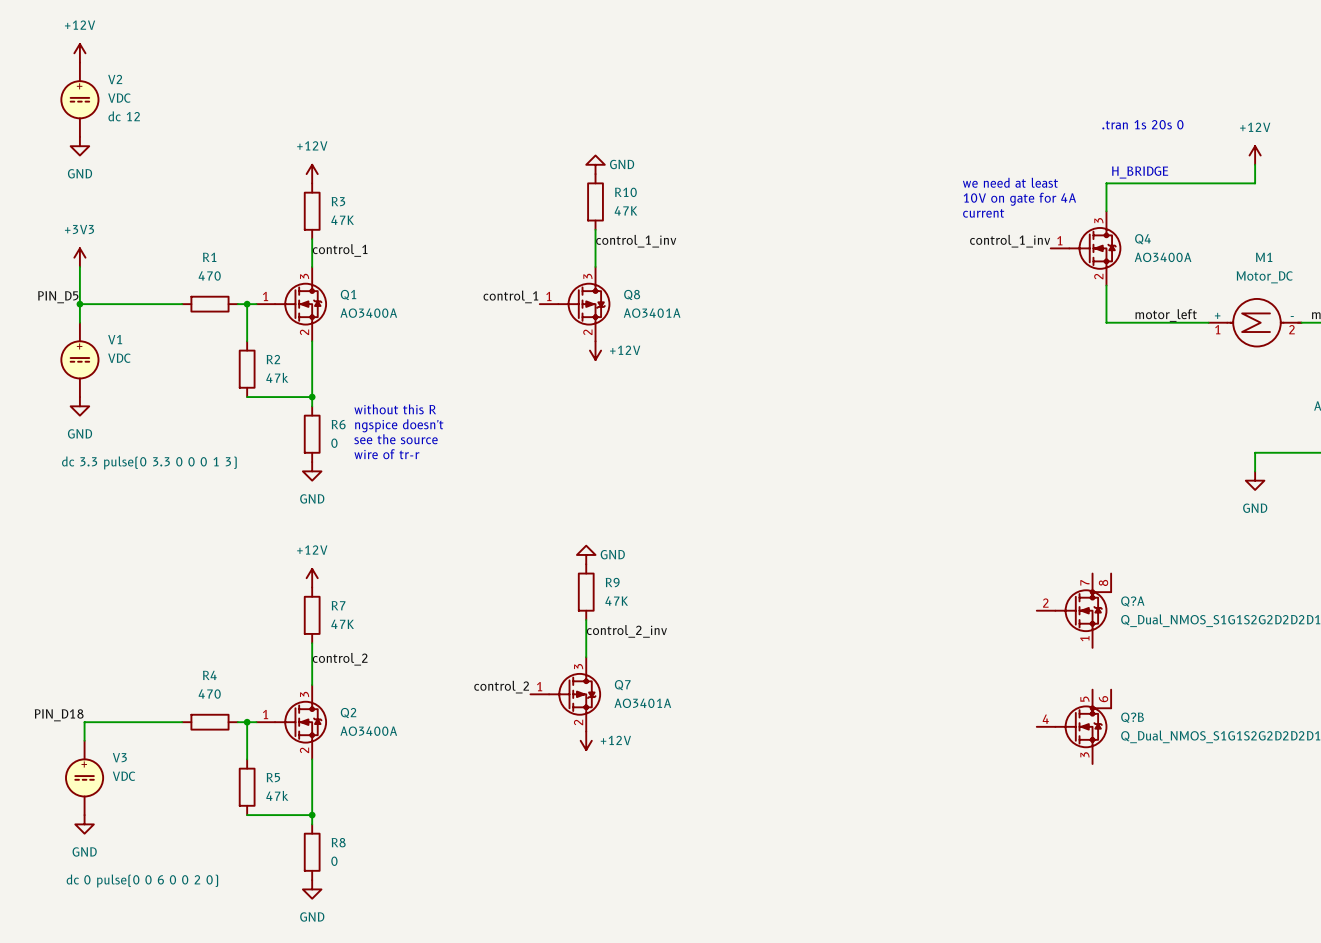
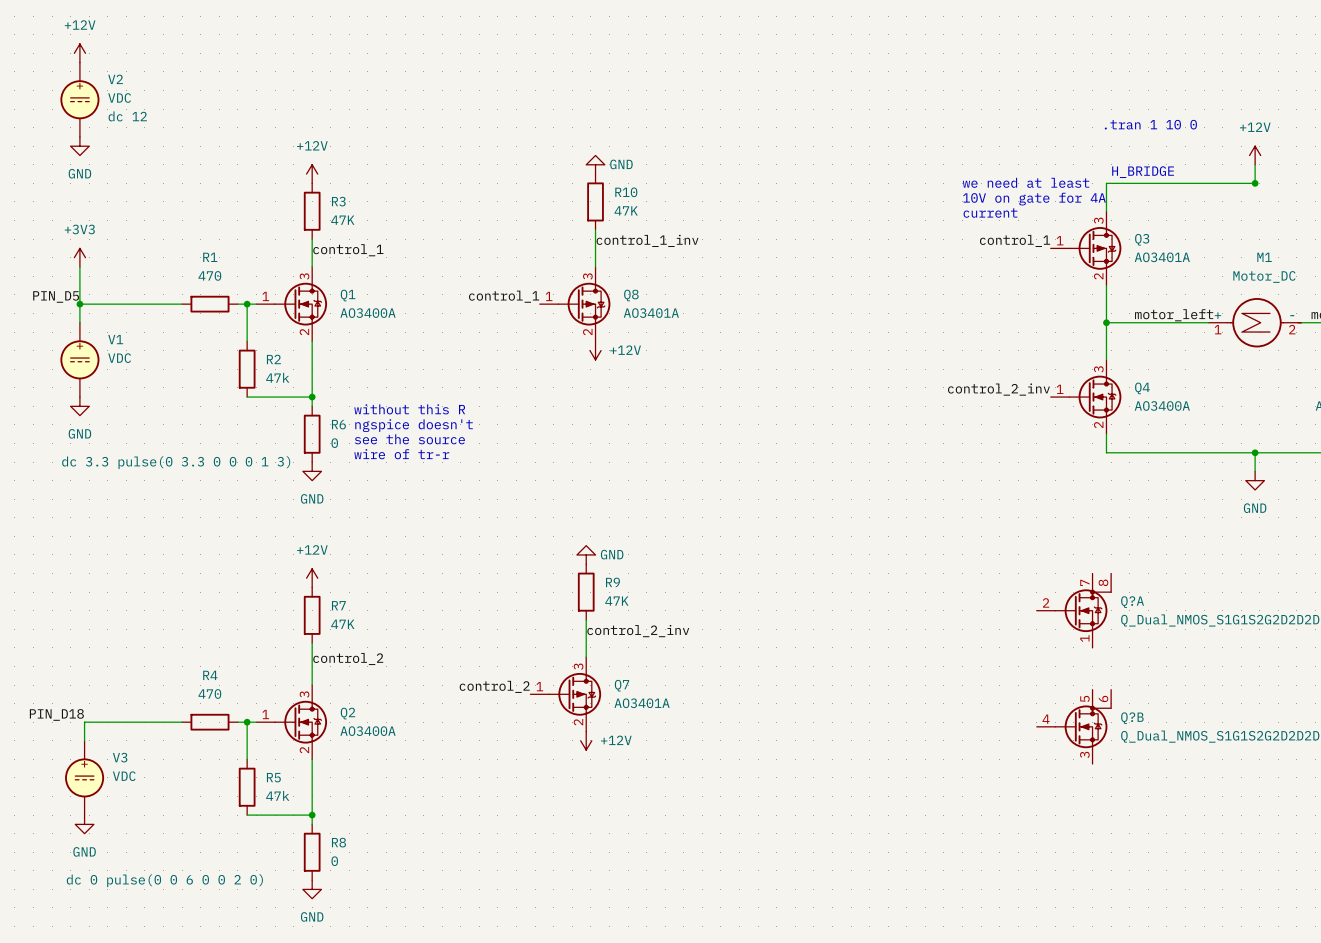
text: .tran 1s 20s 0 (1142, 124) -> .tran 1 10 0 (1150, 124)
junction: none -> (1255, 183)
label: control_1_inv (1010, 241) -> control_1 (1015, 240)
Q4 position: (1086, 248) -> (1086, 397)
Q3: none -> AO3401A (1086, 248)
wire: none -> (1106, 322) (1106, 359)
junction: none -> (1106, 322)
label: none -> control_2_inv (998, 389)
wire: none -> (1106, 434) (1106, 452) (1255, 452)
junction: none -> (1255, 452)

